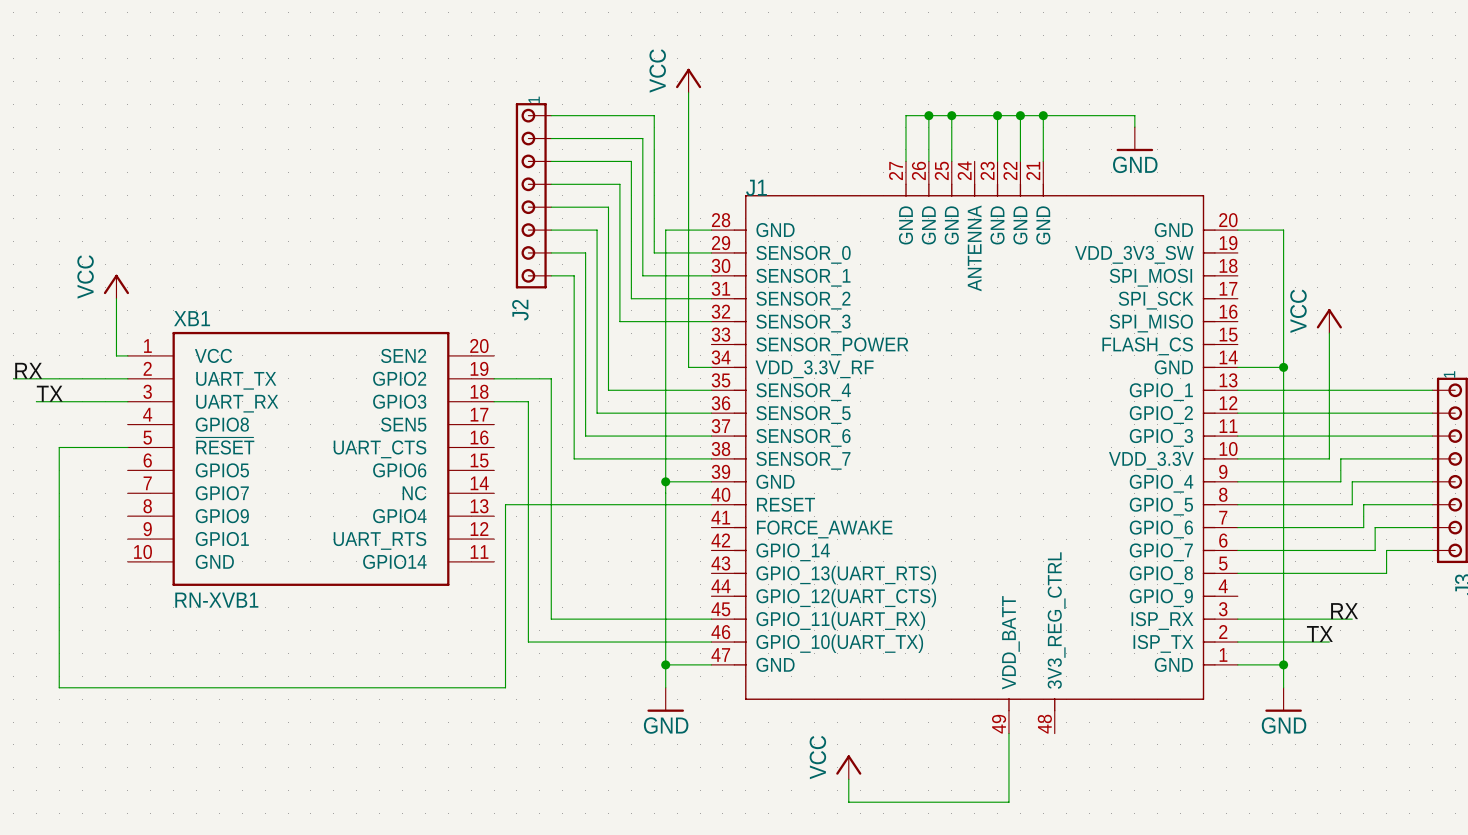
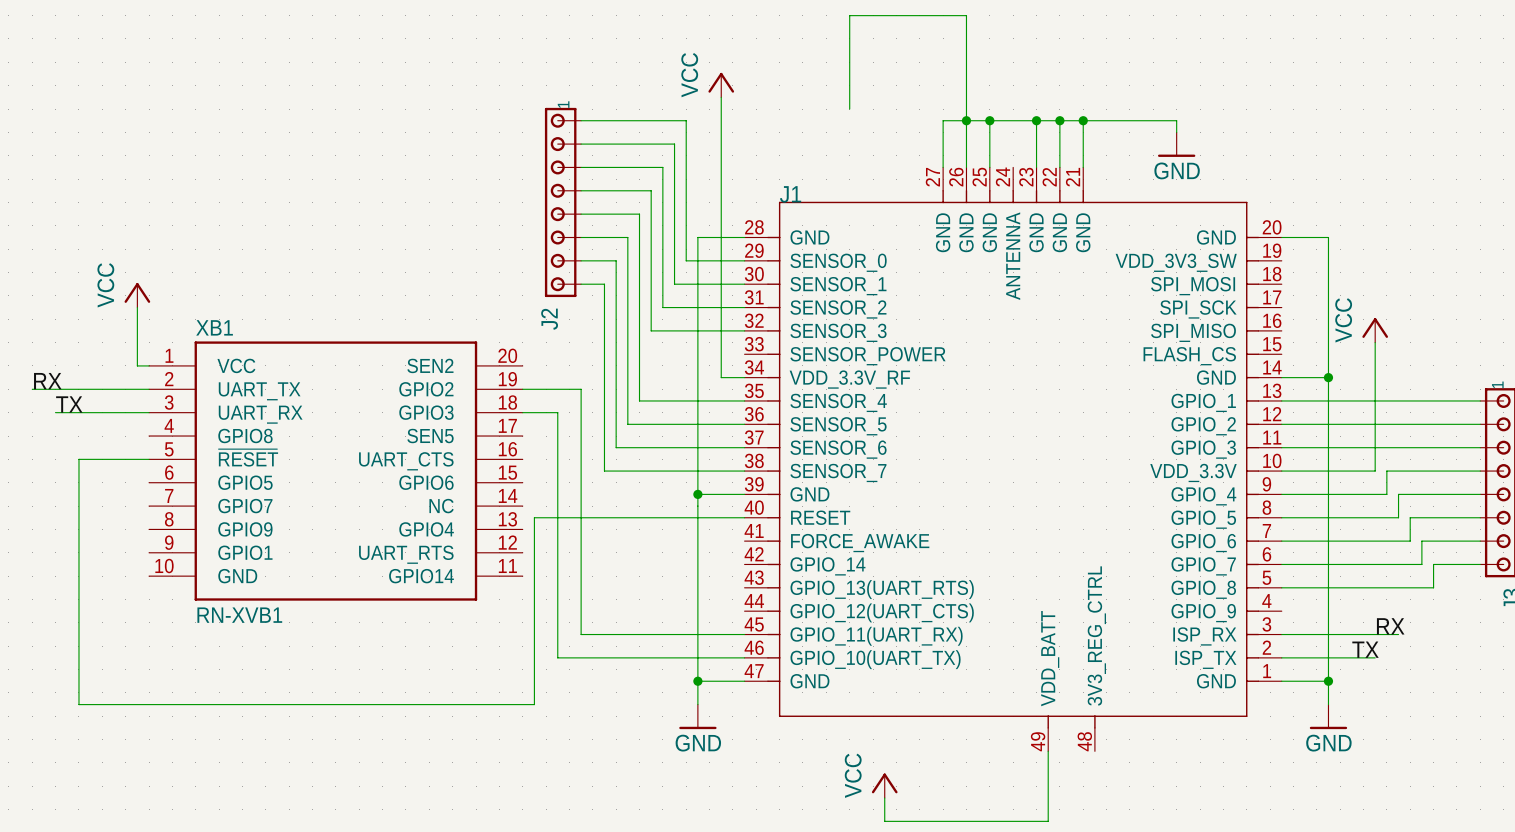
wire: none -> (849, 109) (849, 15) (966, 15) (966, 120)

